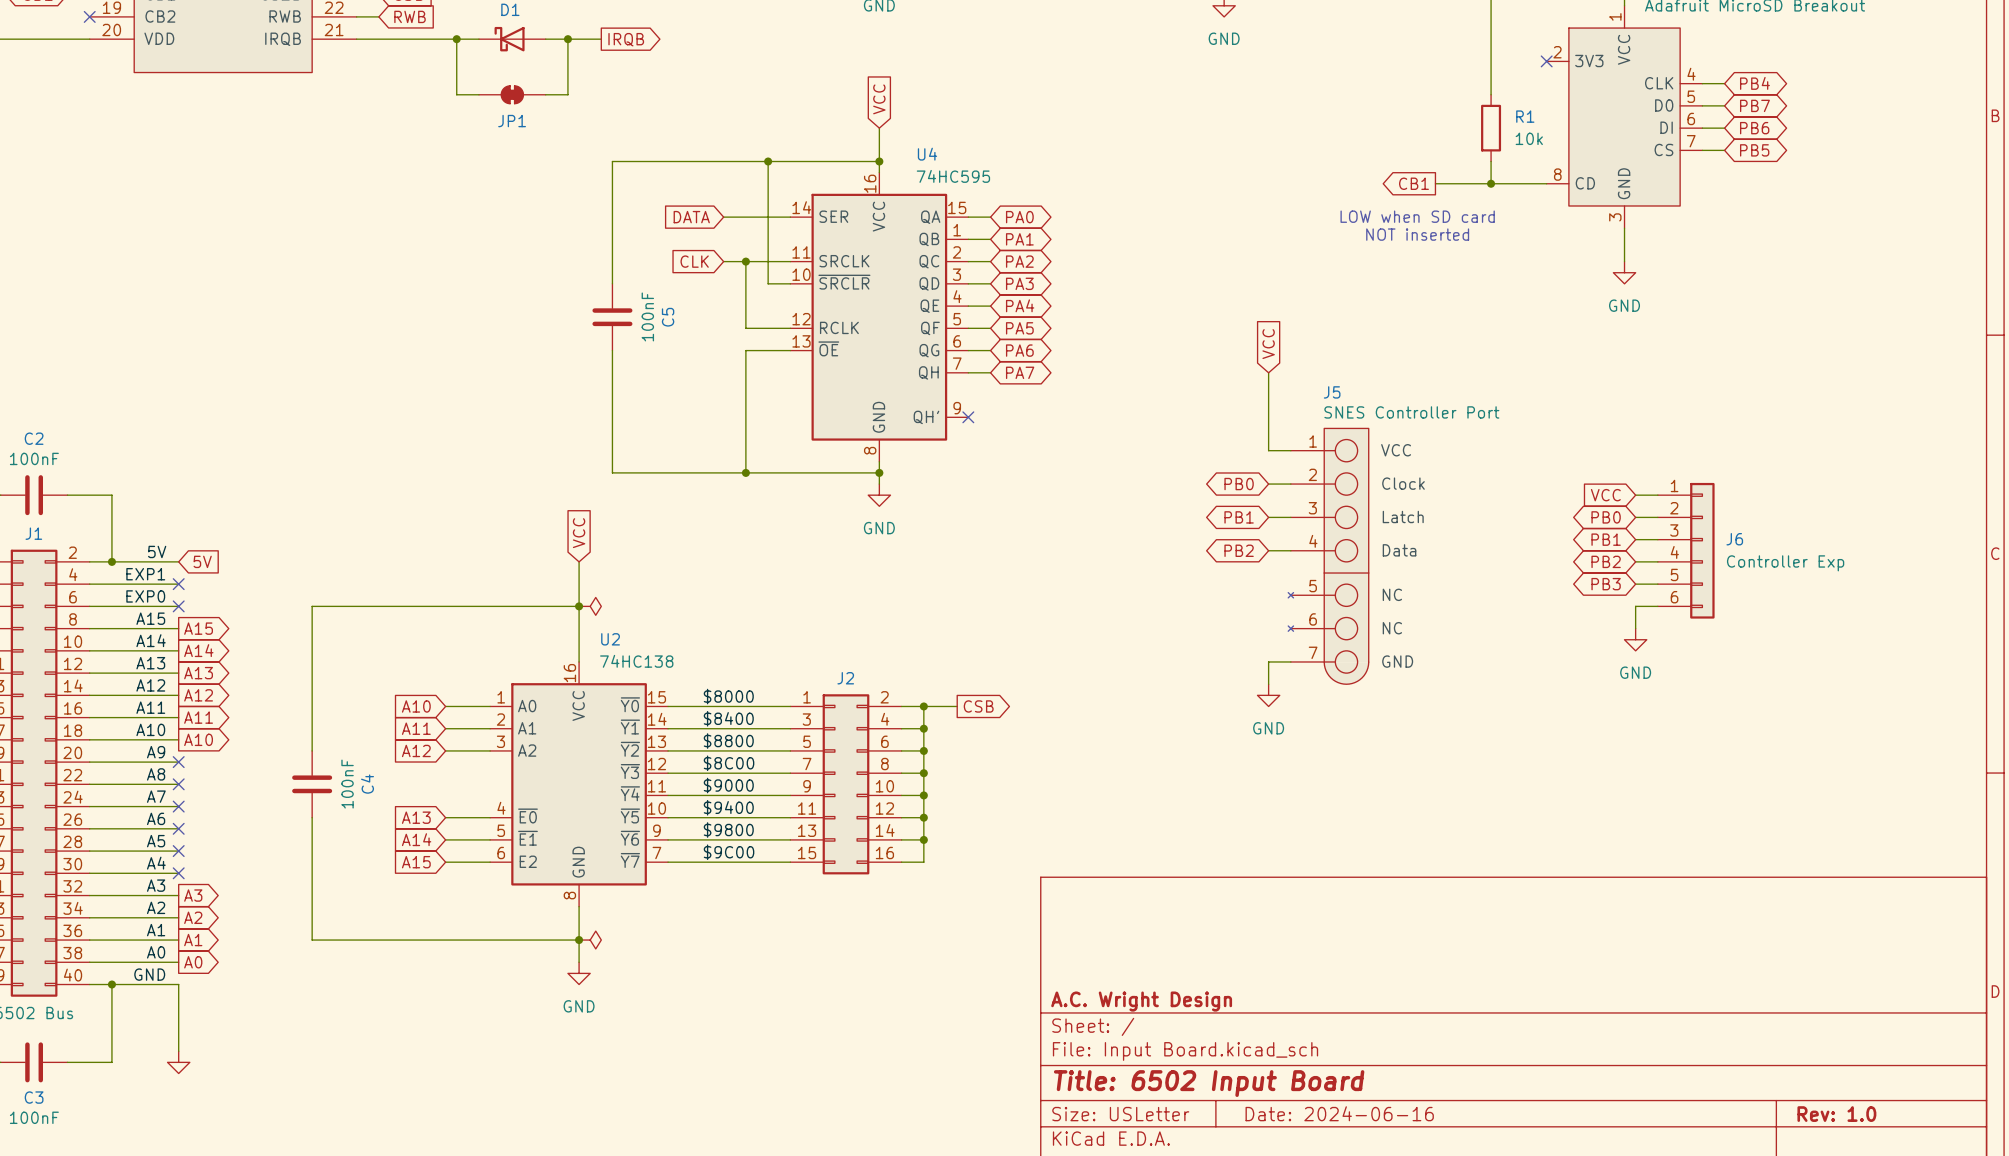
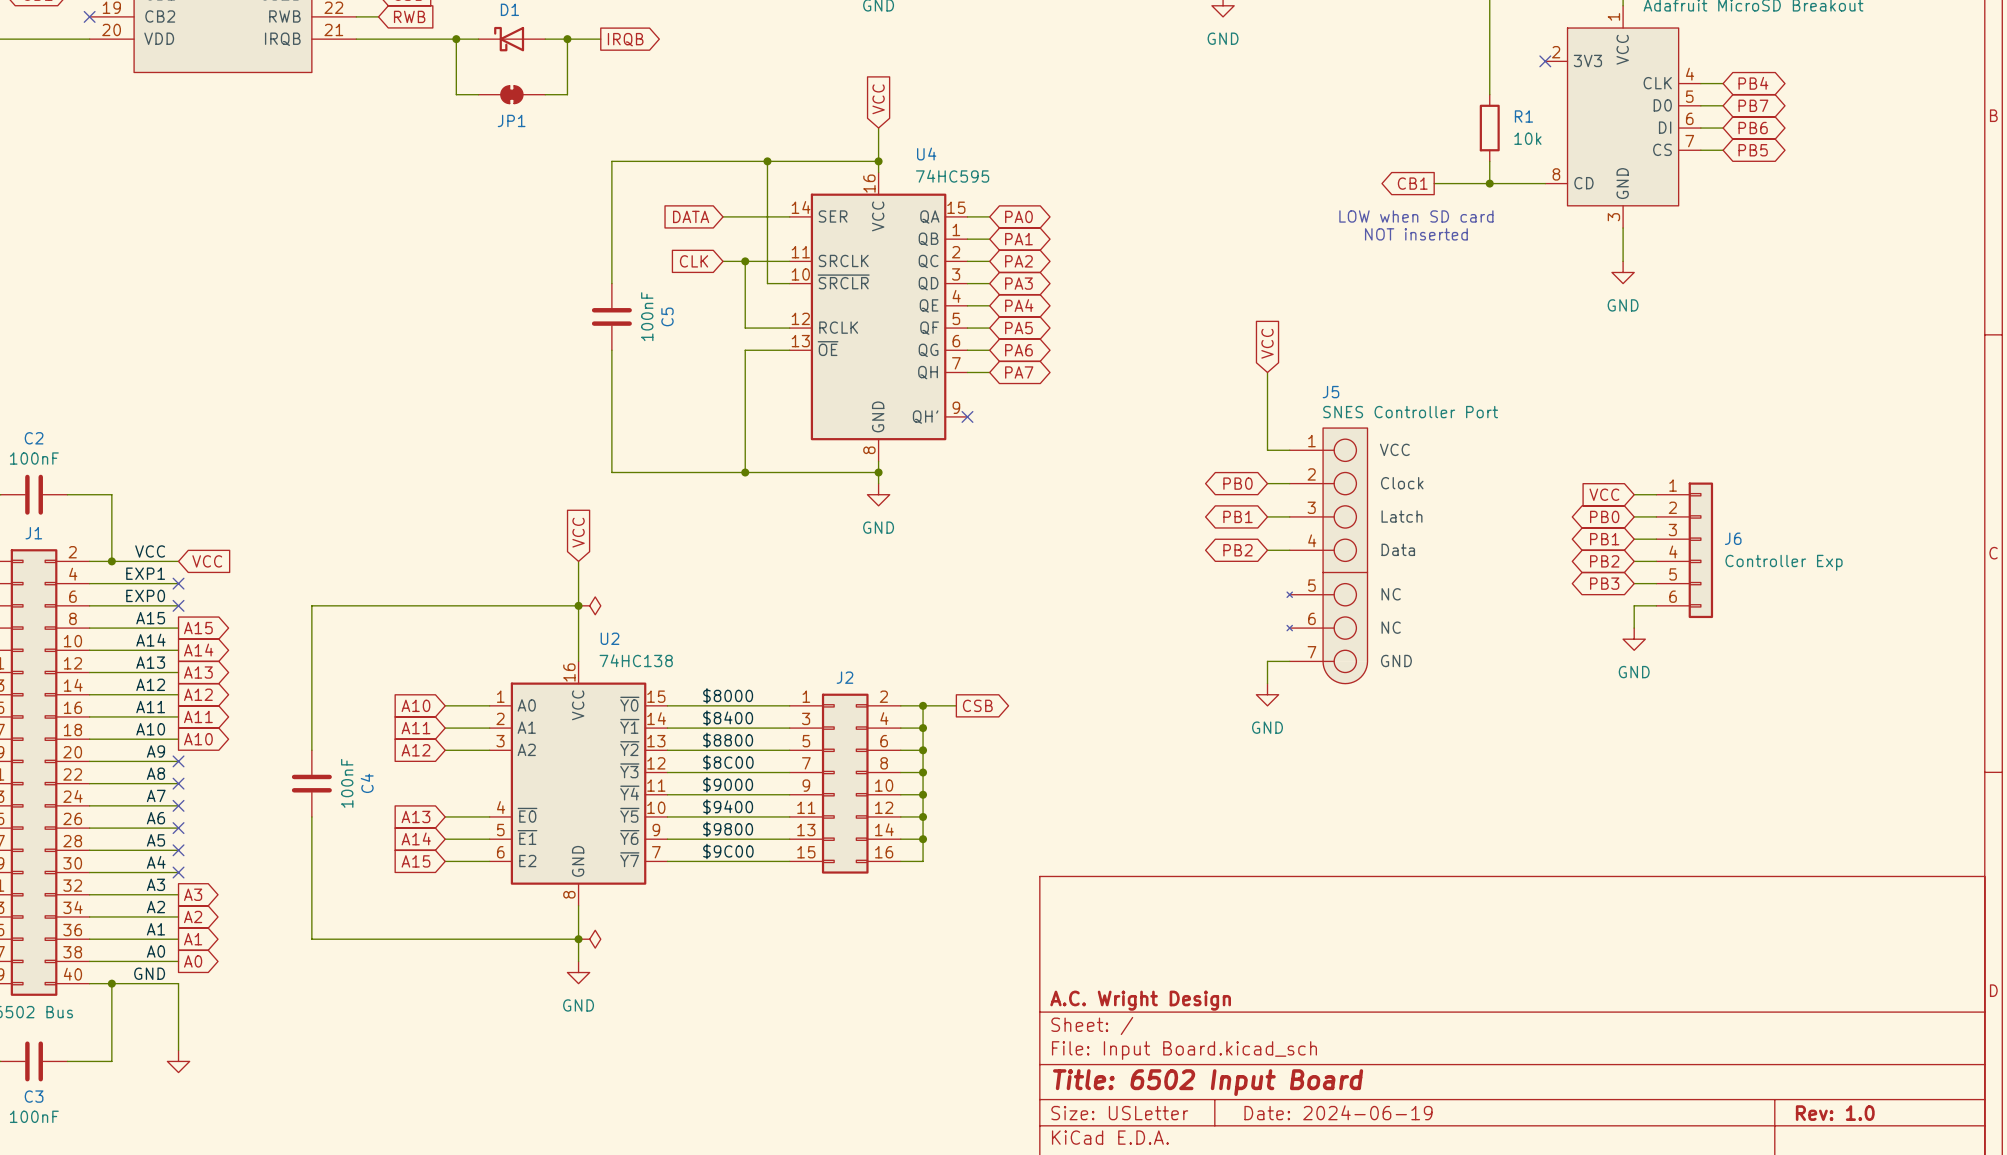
label: 5V (157, 551) -> VCC (150, 551)
global label: 5V (202, 561) -> VCC (207, 561)
title block: Date: 2024-06-16 (1339, 1113) -> Date: 2024-06-19 (1338, 1112)

